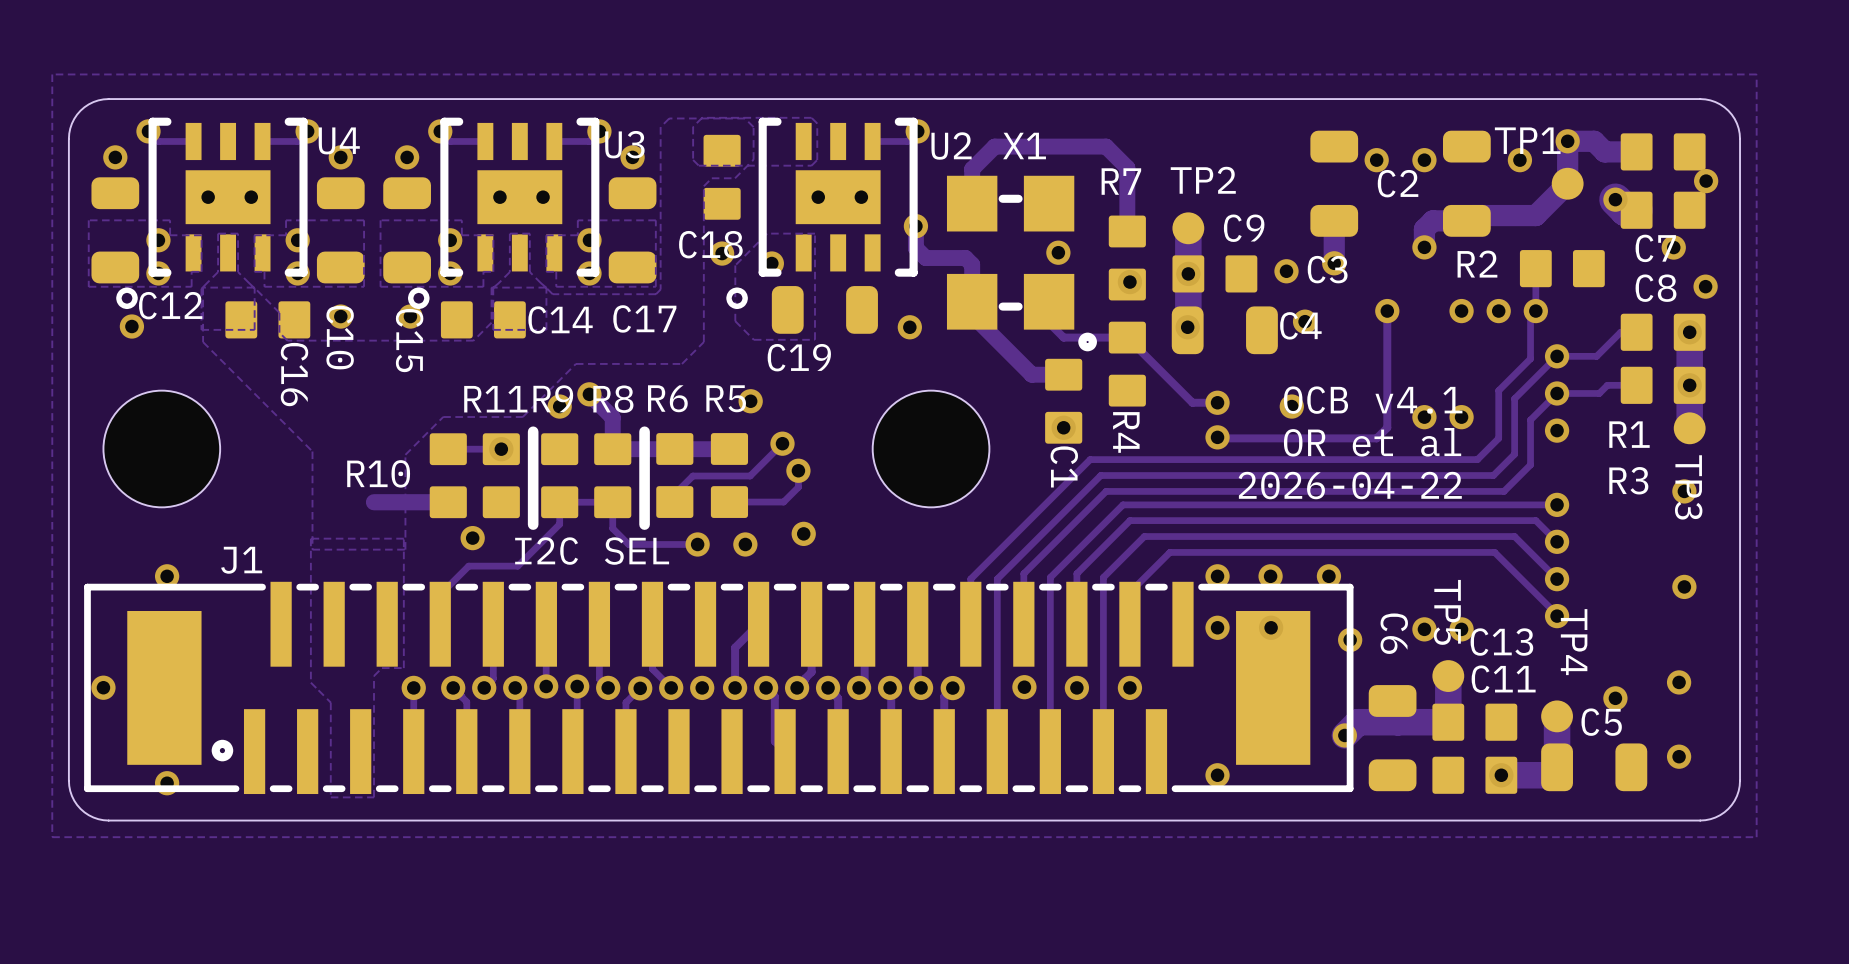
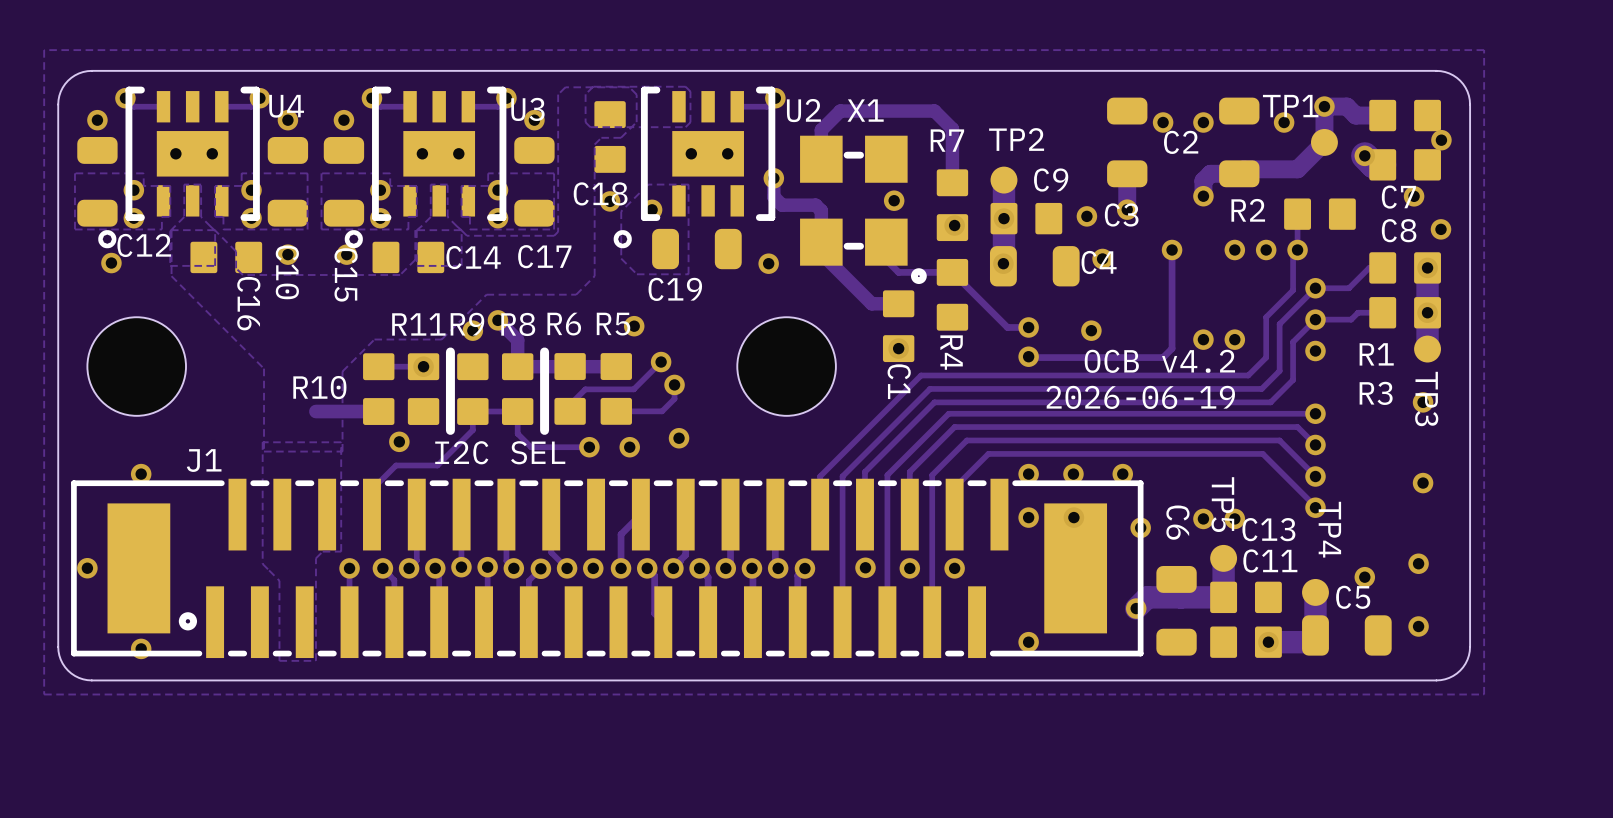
text: OCB v4.1 (1373, 400) -> none
text: OR et al (1372, 442) -> OCB v4.2 (1159, 361)
text: 2026-04-22 (1350, 485) -> 2026-06-19 (1140, 397)

